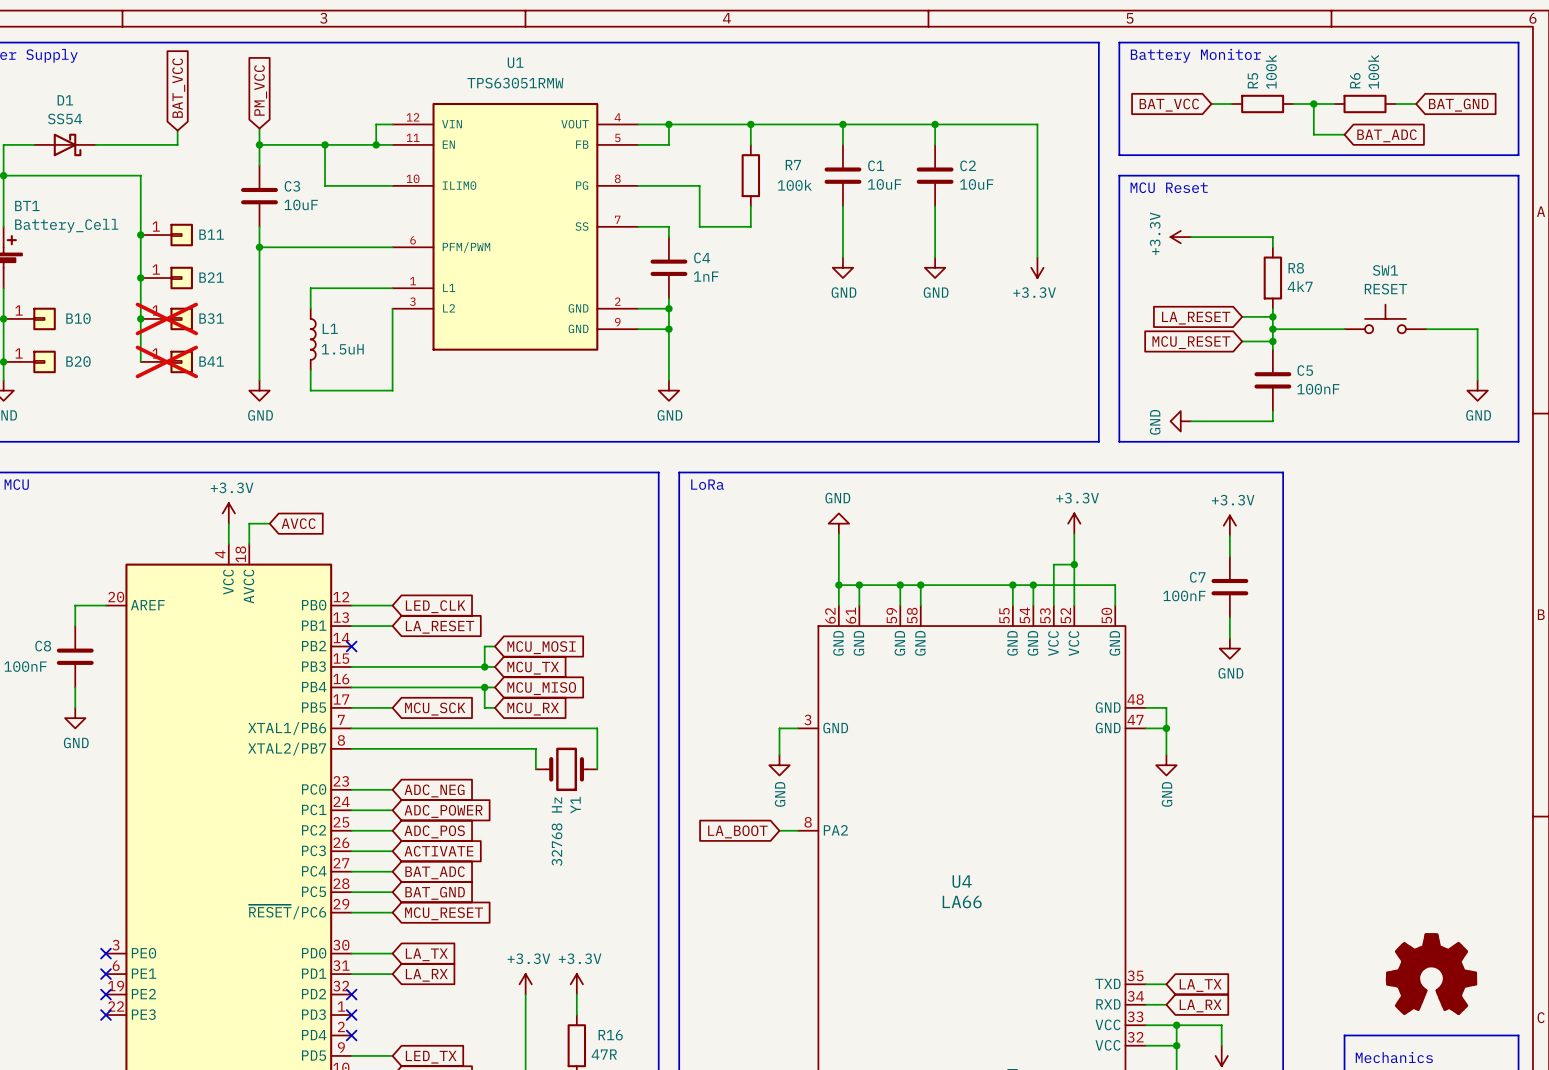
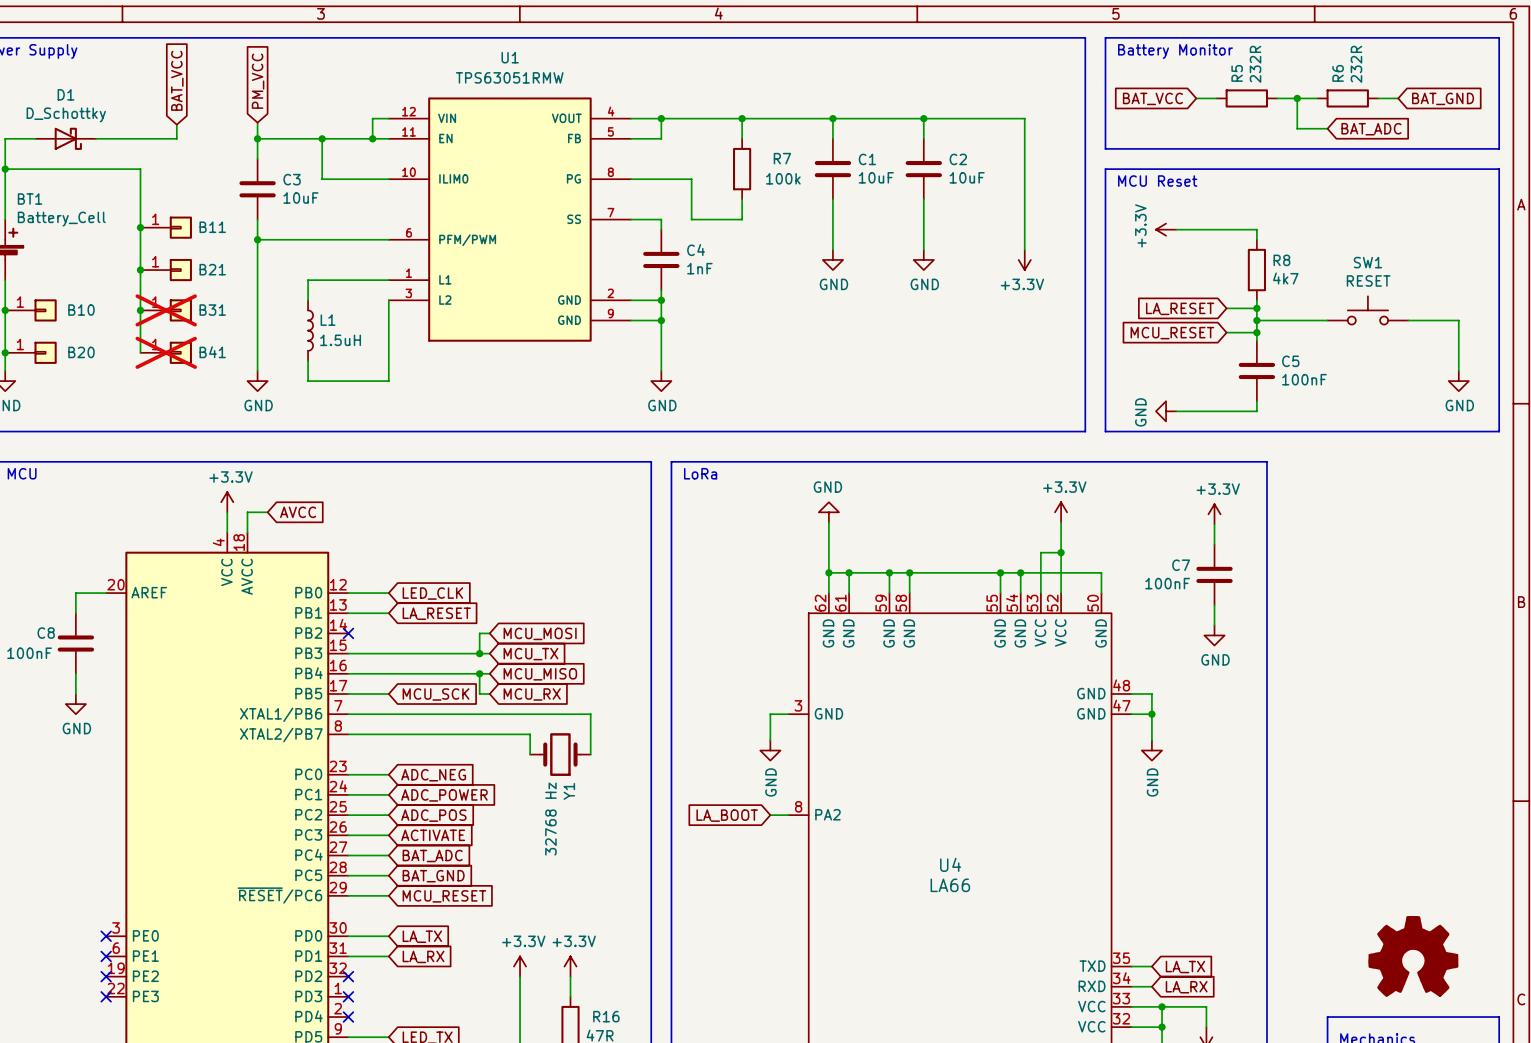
R5 value: 100k (1271, 71) -> 232R (1255, 64)
R6 value: 100k (1373, 71) -> 232R (1356, 64)
D1 value: SS54 (65, 118) -> D_Schottky (66, 114)

